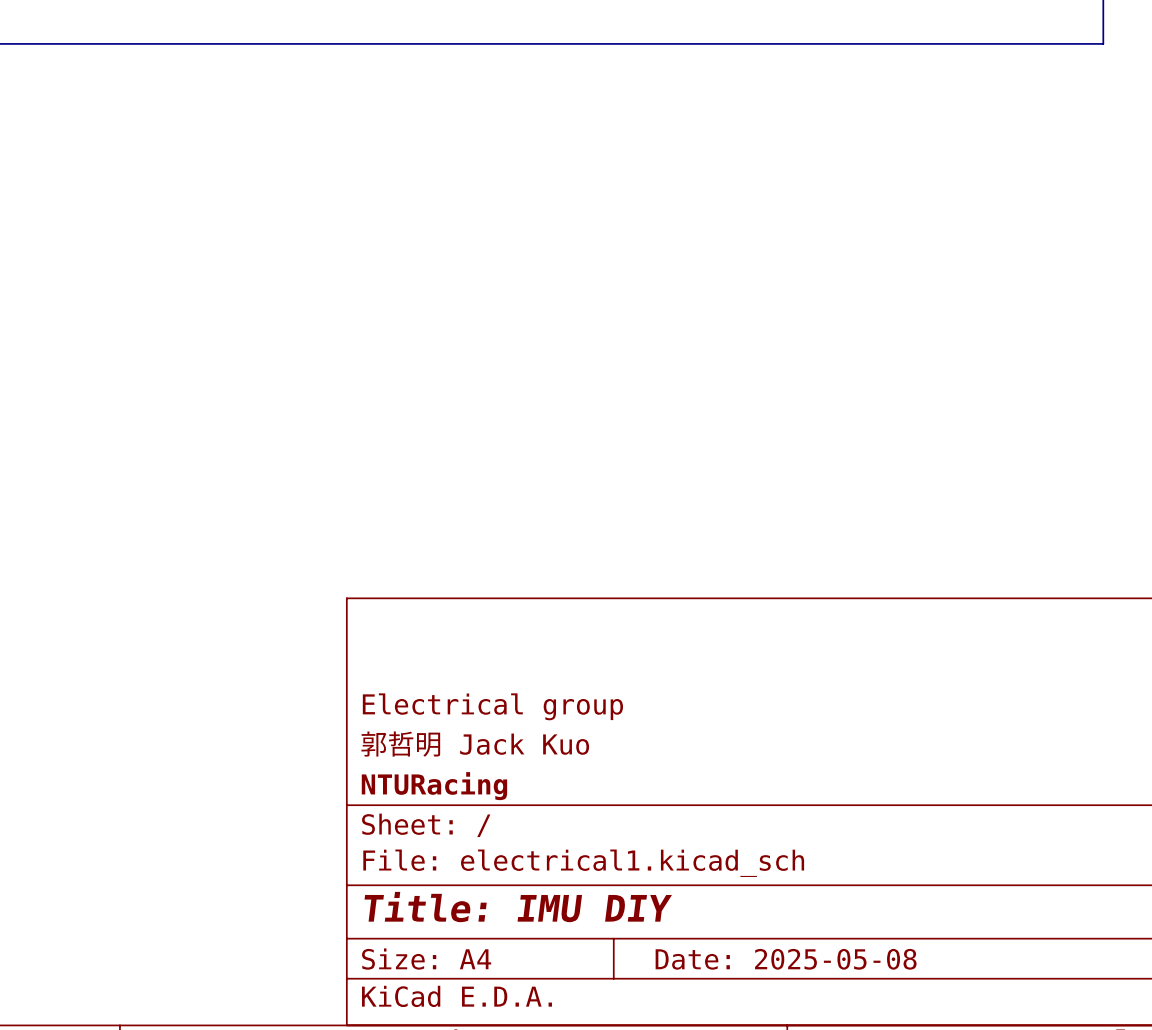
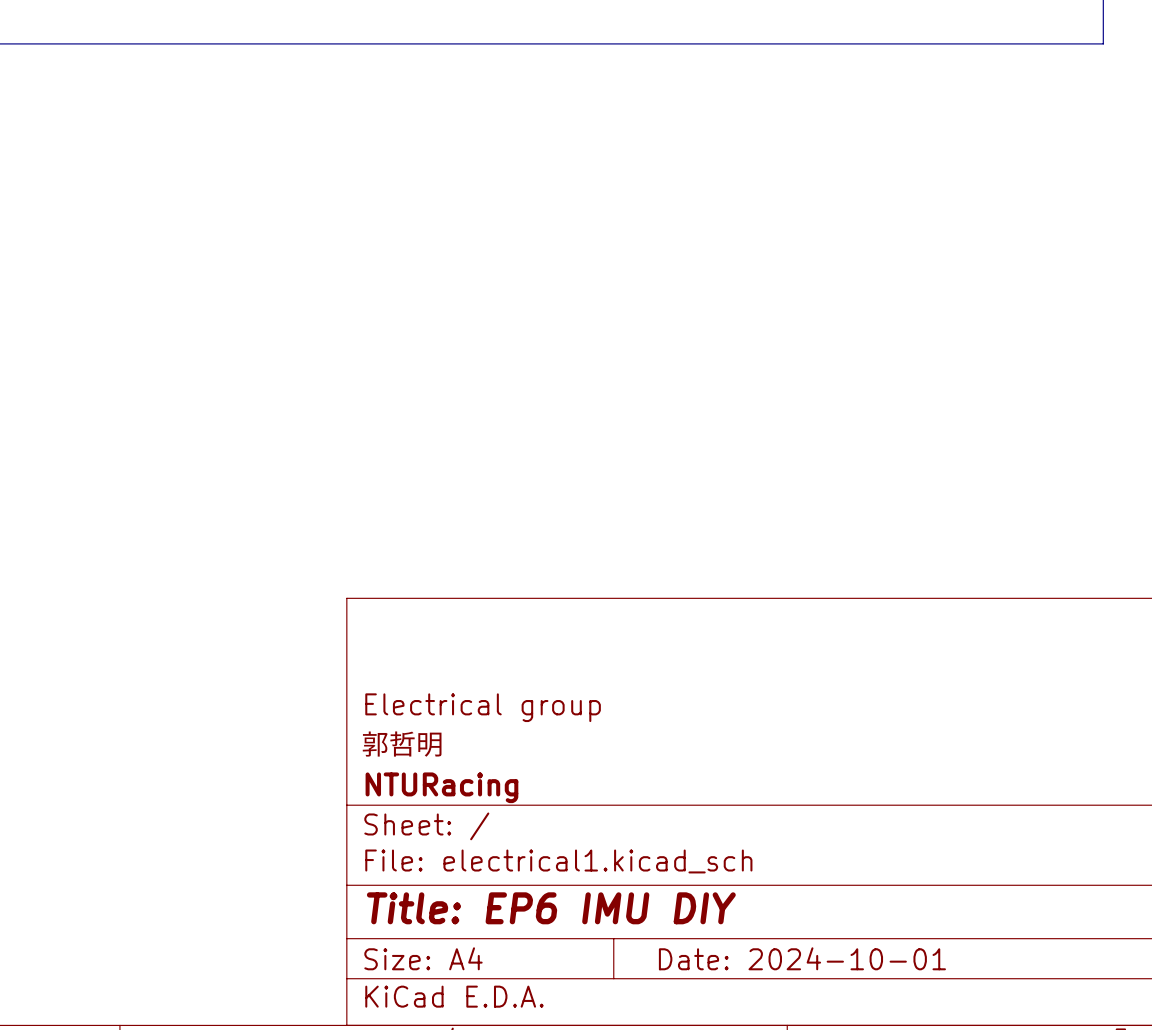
title block: 郭哲明 Jack Kuo (475, 744) -> 郭哲明 (402, 744)
title block: Title: IMU DIY (518, 907) -> Title: EP6 IMU DIY (551, 908)
title block: Date: 2025-05-08 (786, 959) -> Date: 2024-10-01 (802, 958)

